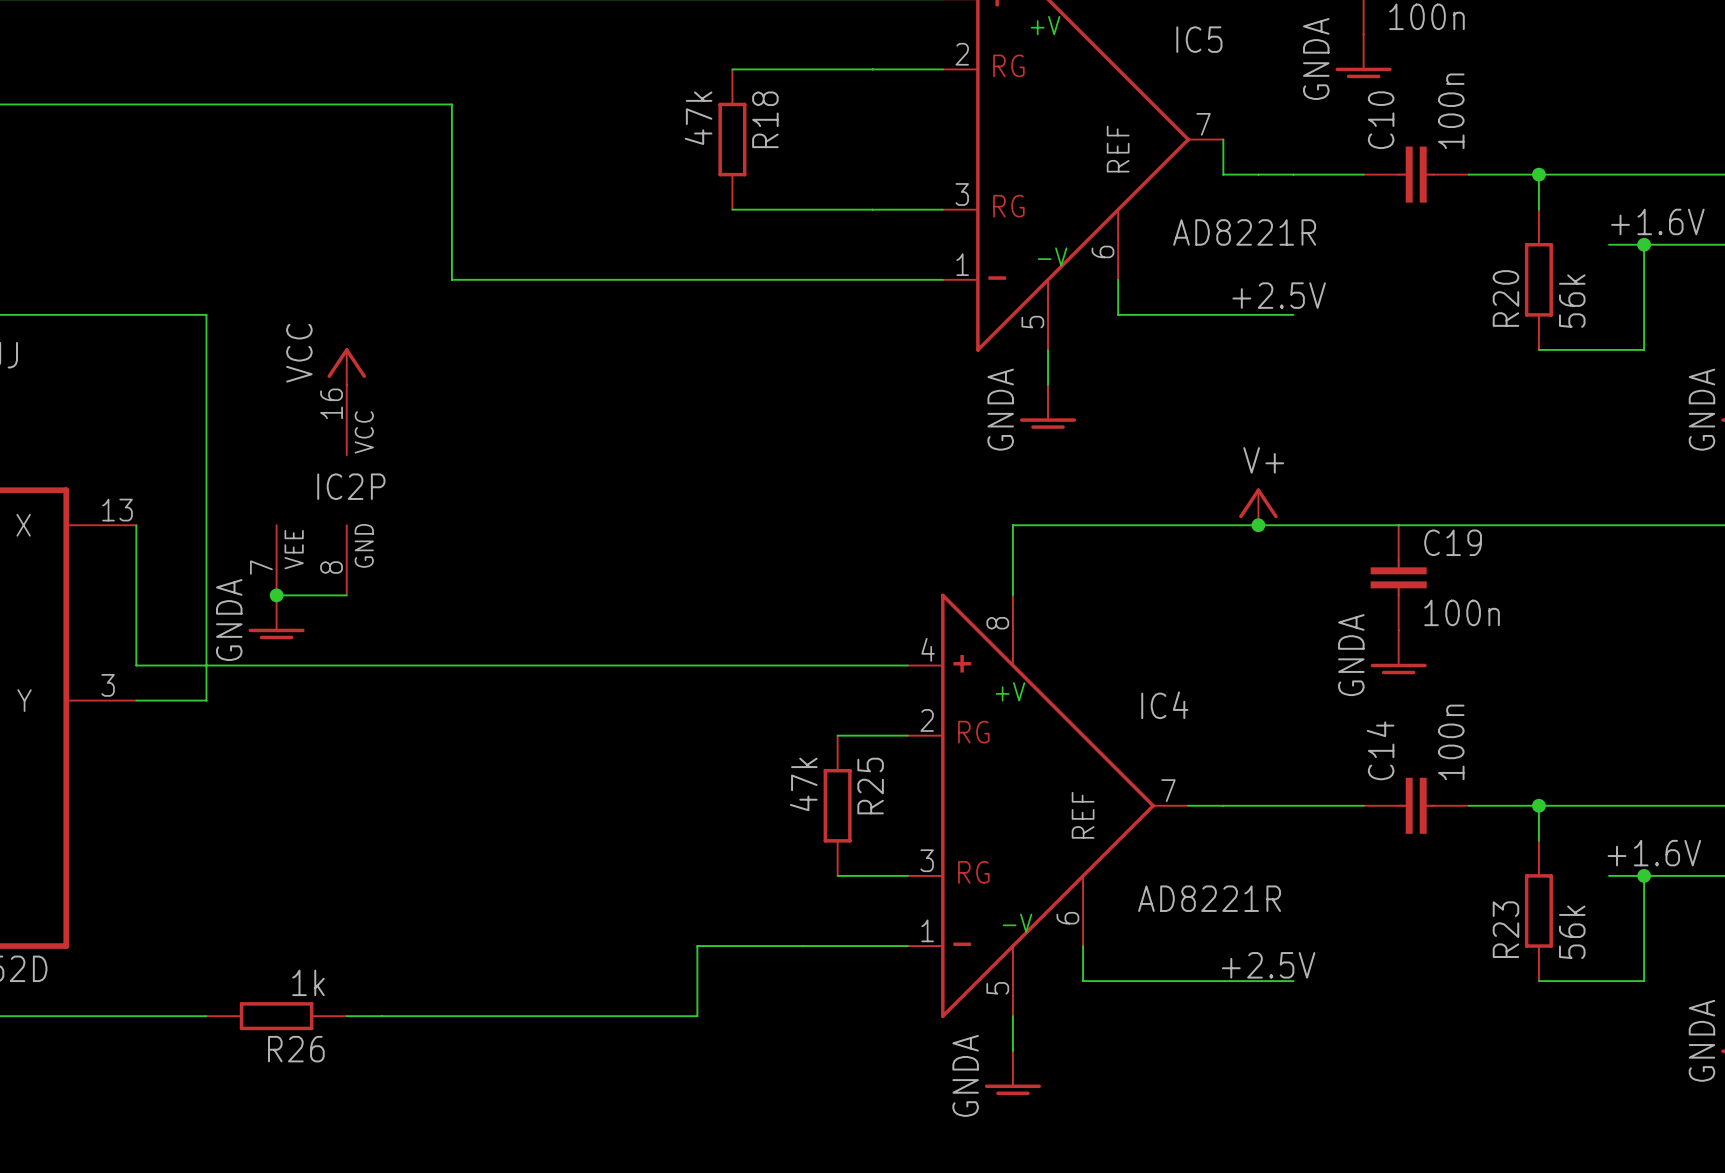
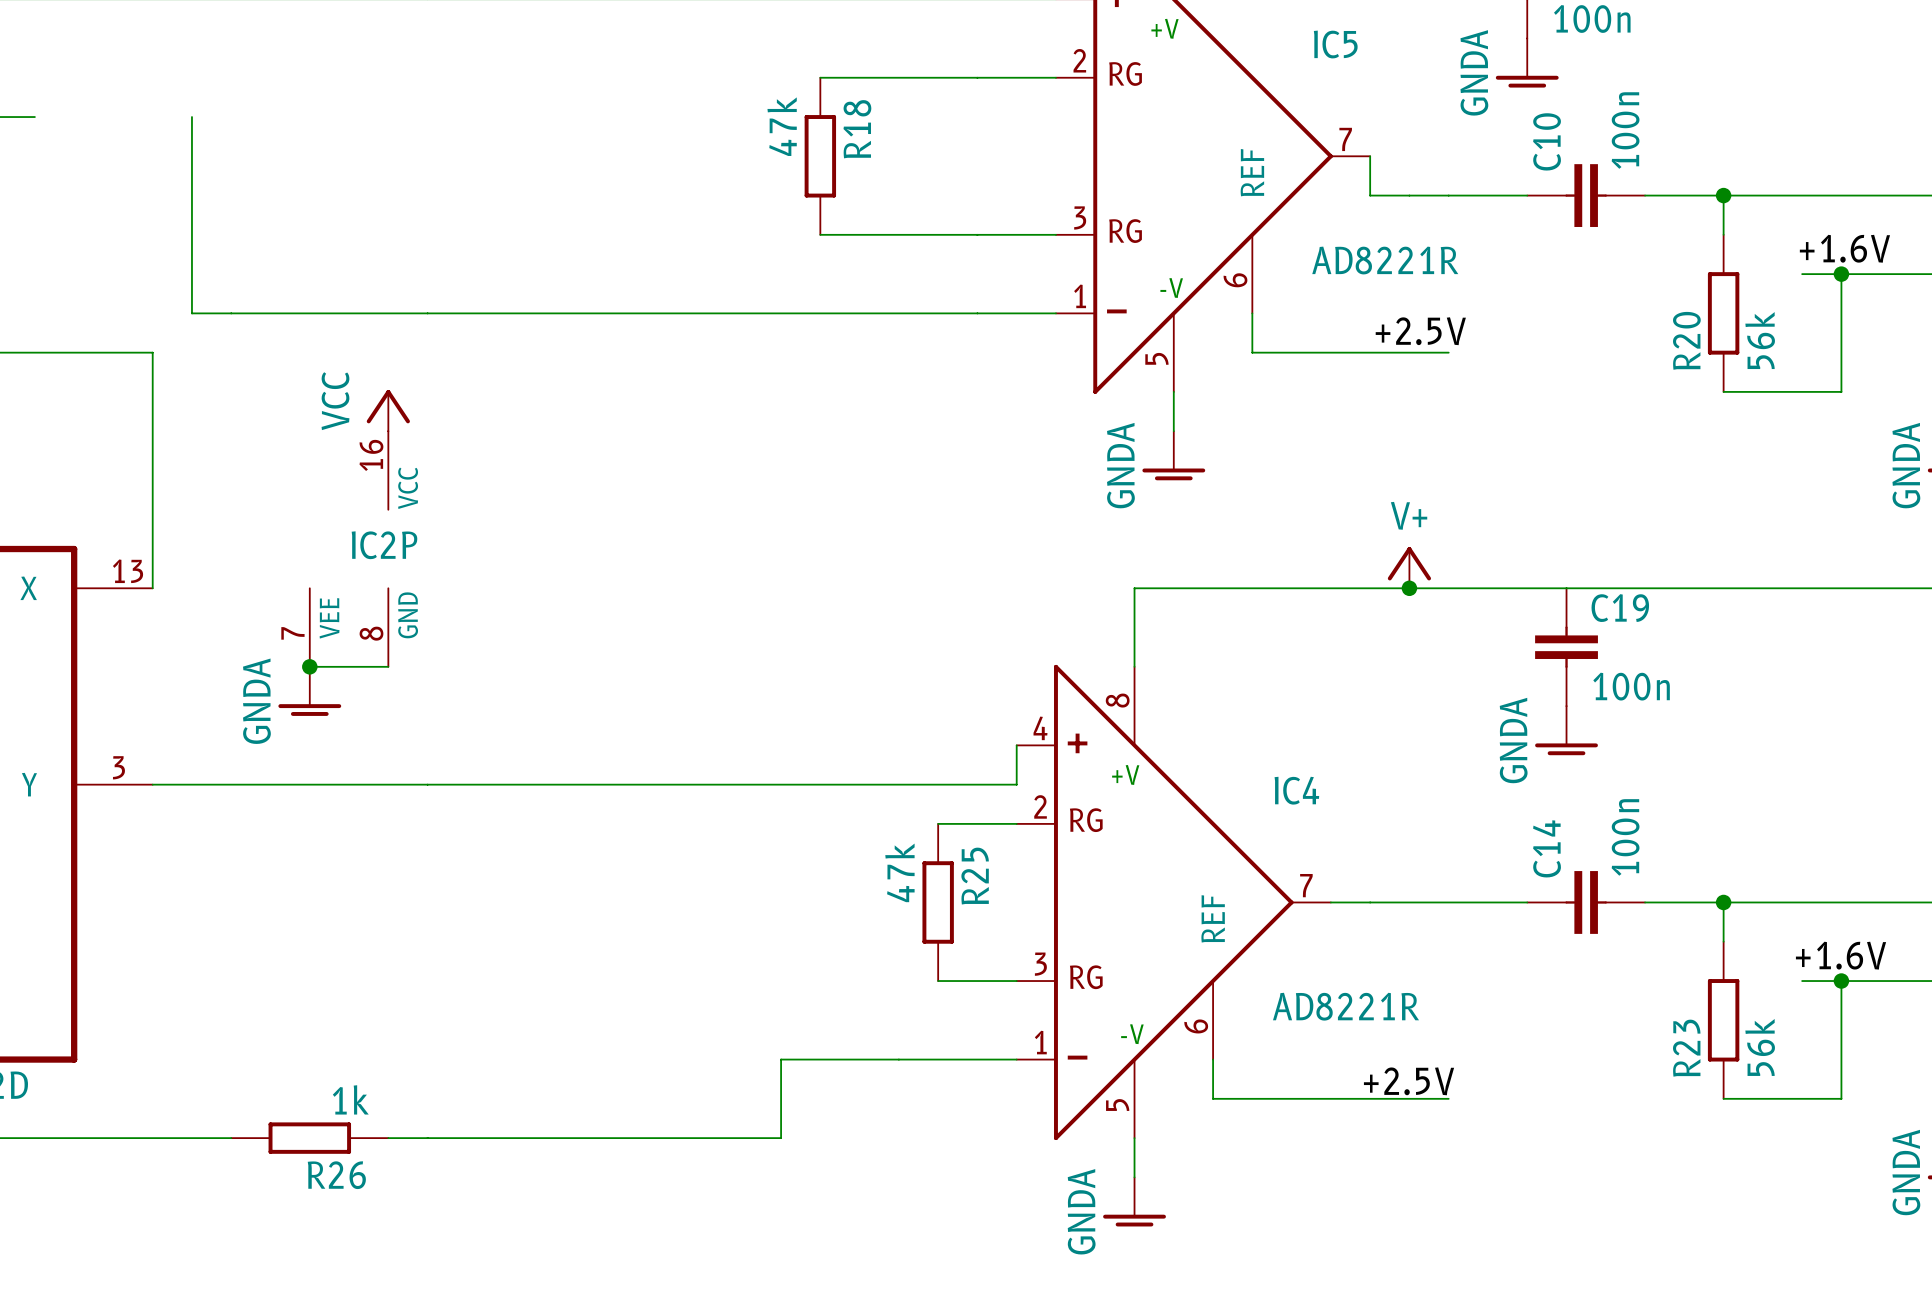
wire: (31, 104) (451, 104) (451, 279) -> (191, 117) (191, 313) (506, 313)
wire: (136, 314) (206, 314) (206, 700) -> (152, 352) (152, 588)
wire: (136, 525) (136, 665) (907, 665) -> (231, 784) (1016, 784) (1016, 745)

